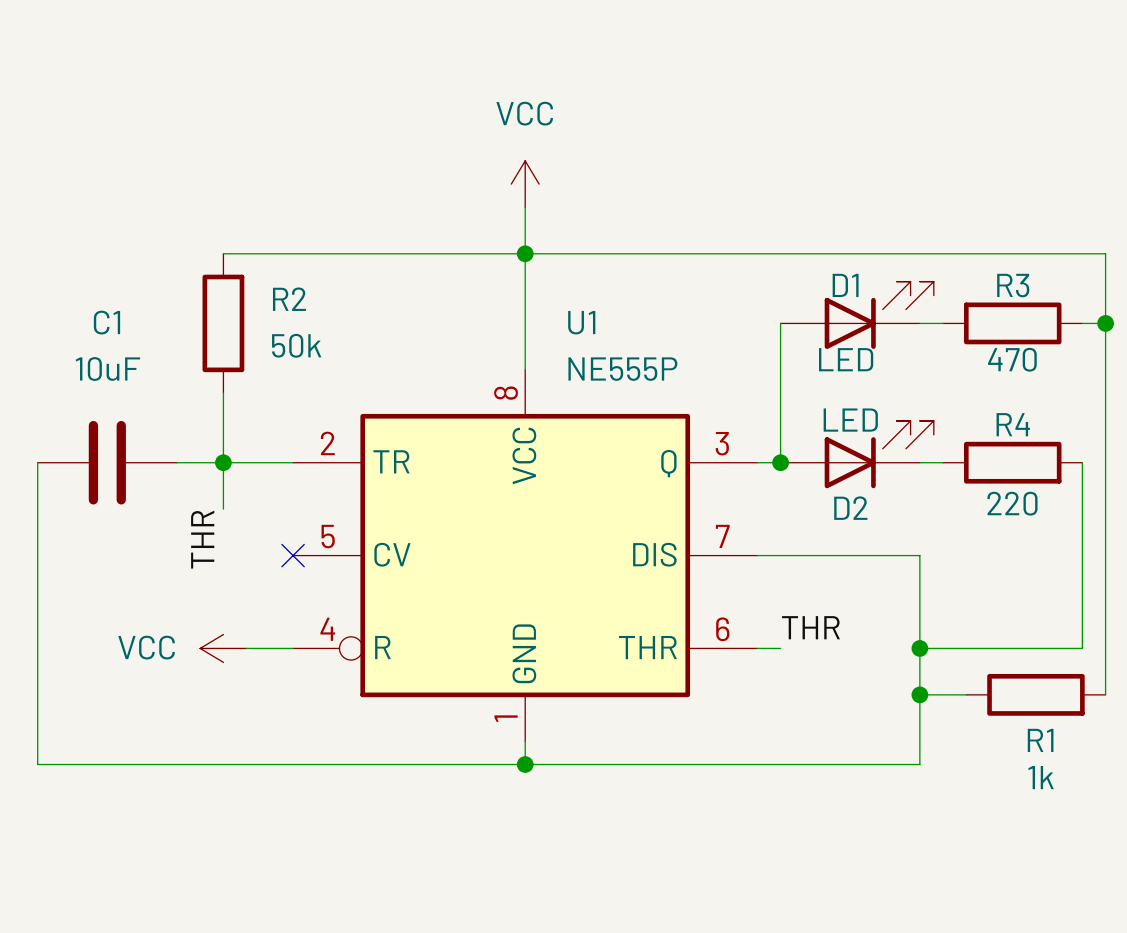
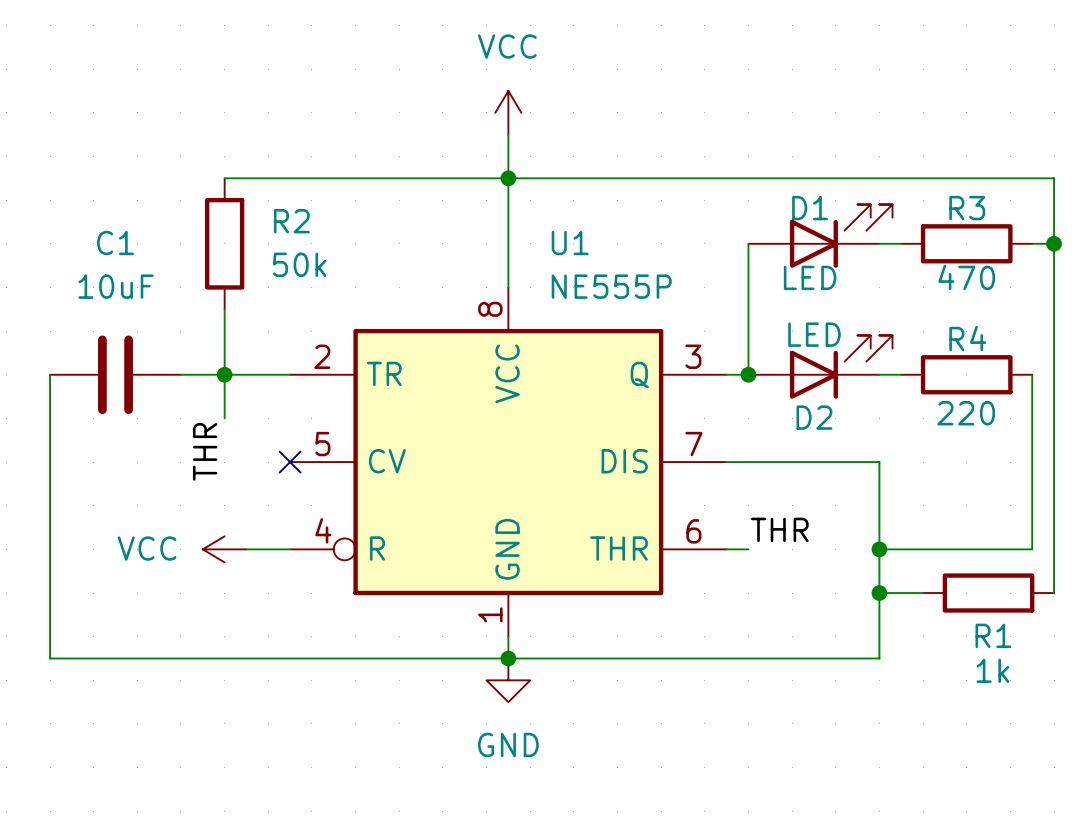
power symbol: none -> GND (508, 680)

